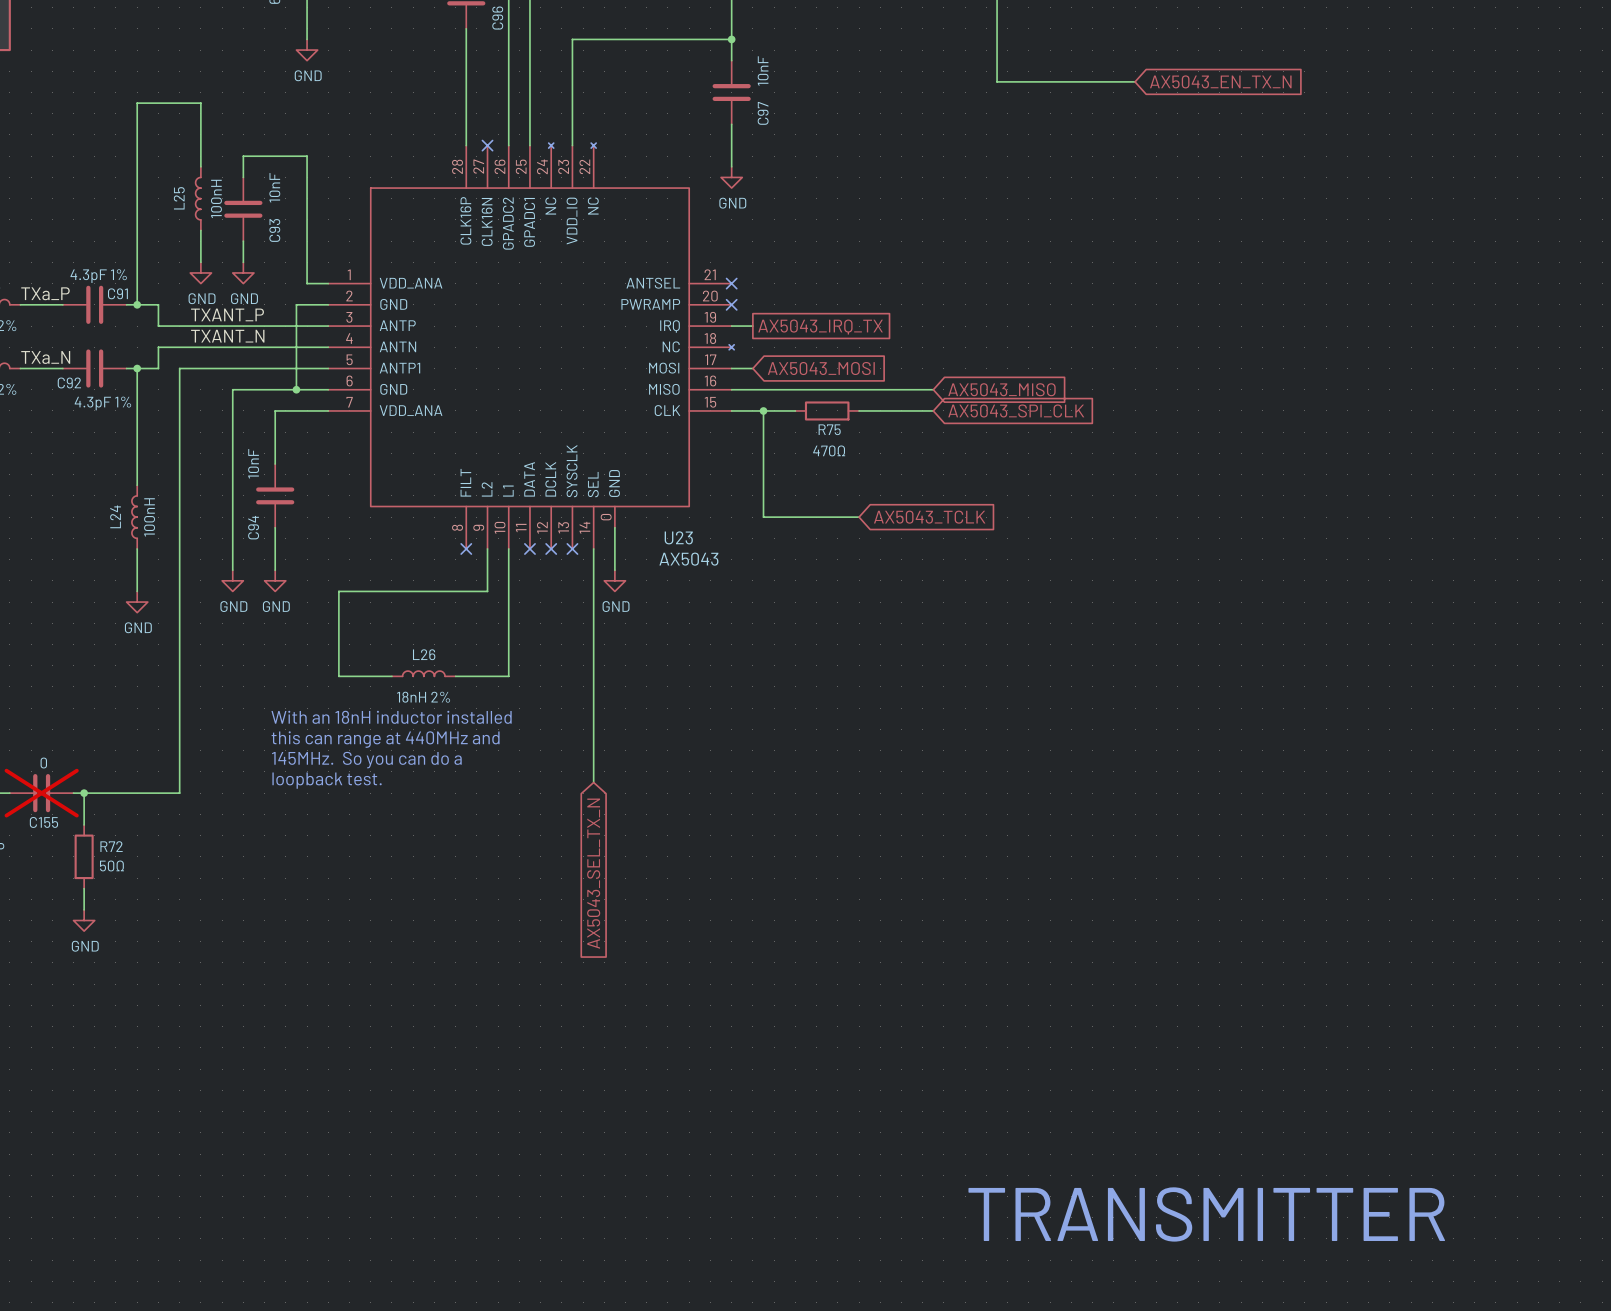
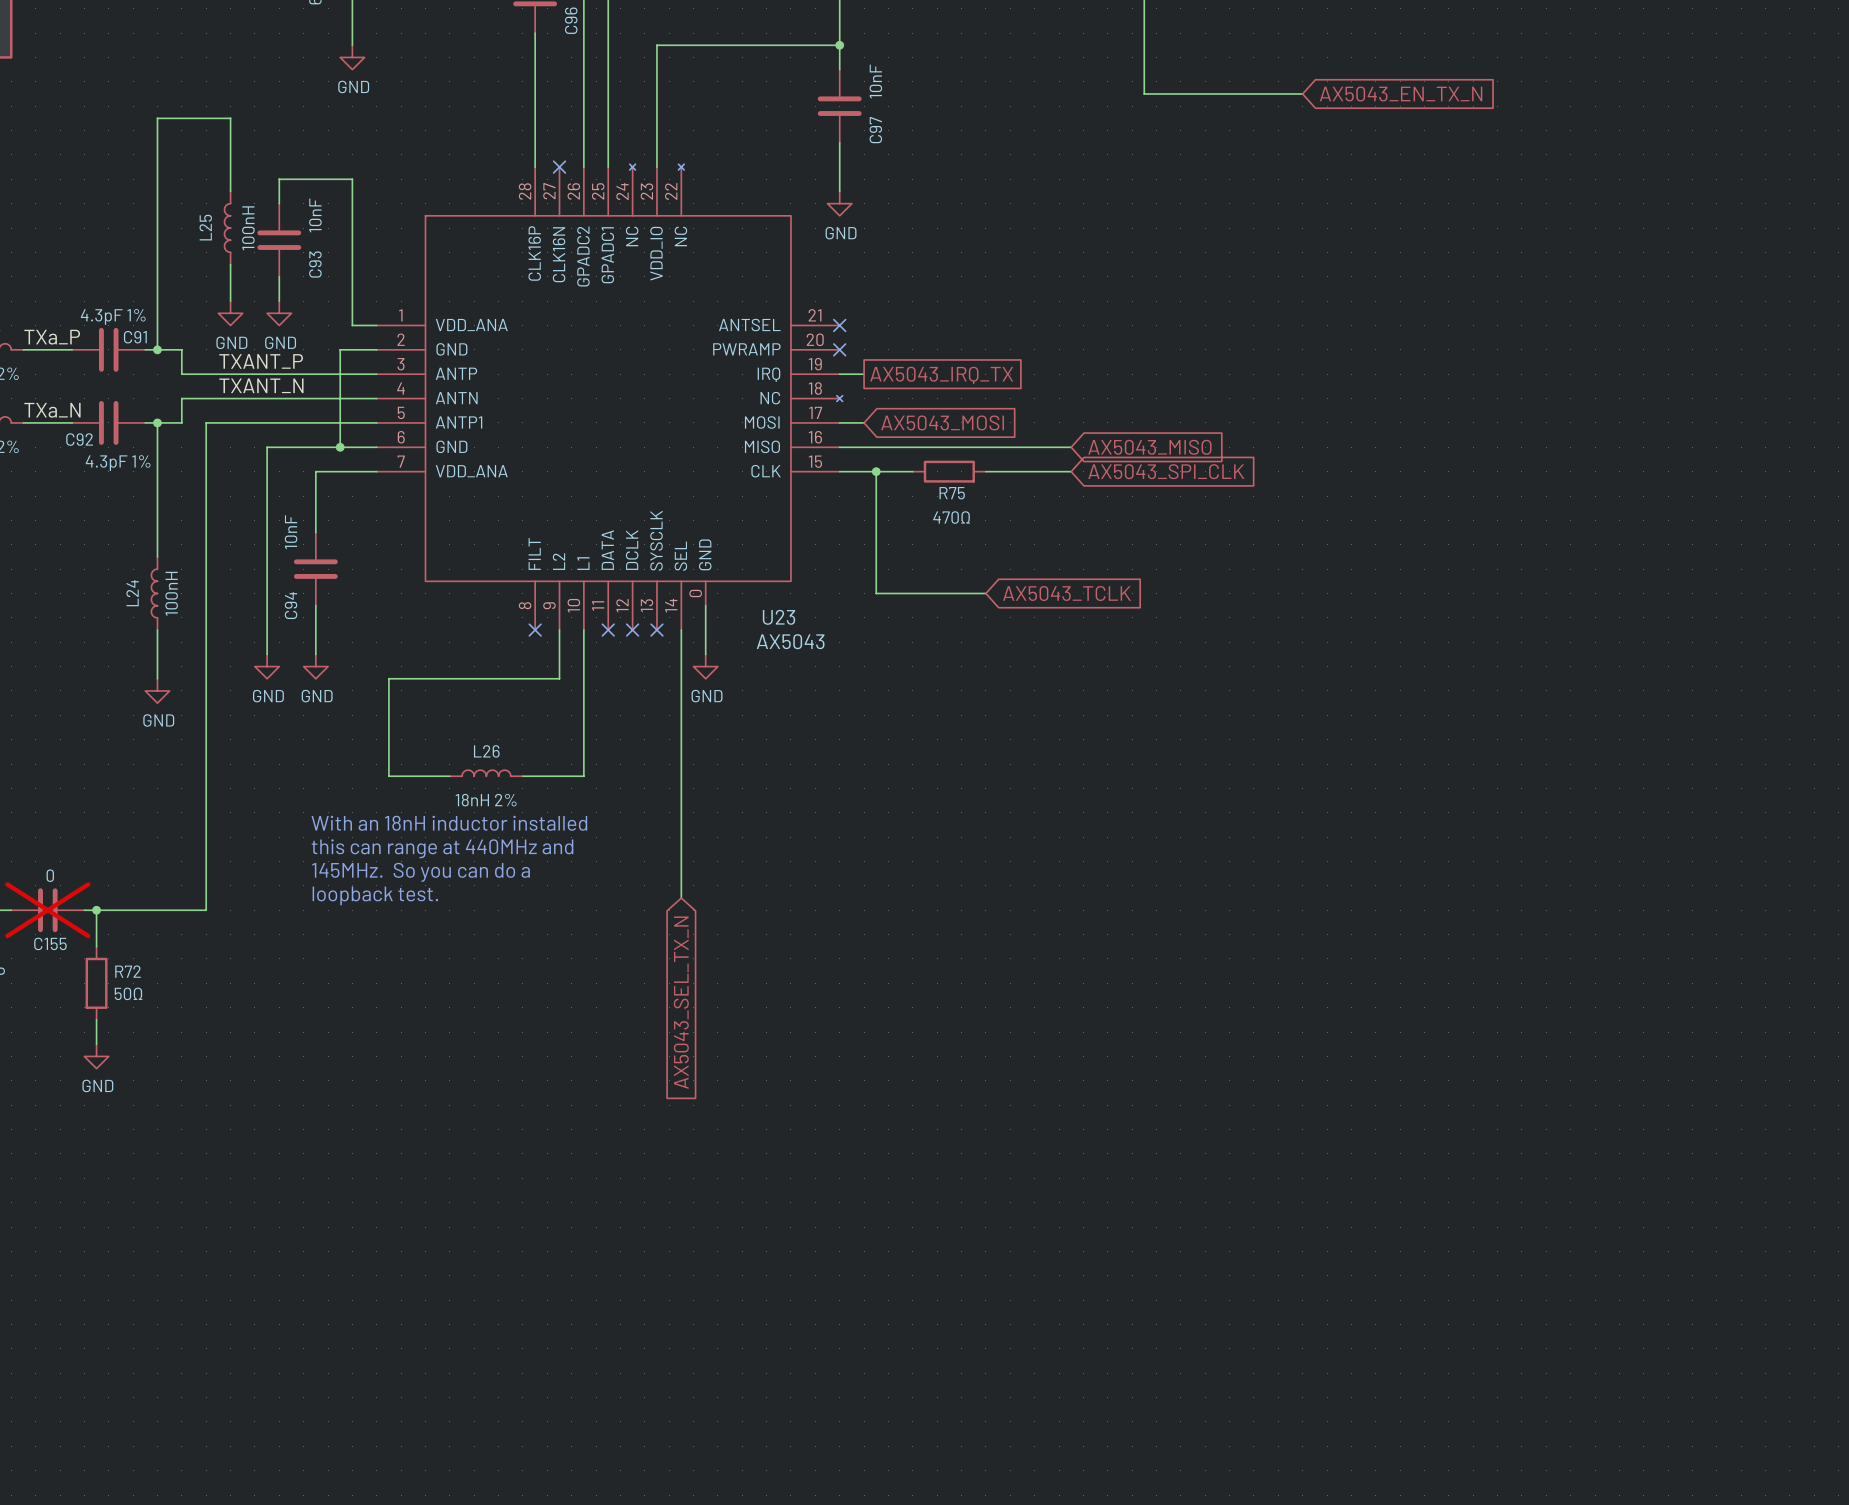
text: TRANSMITTER (1206, 1214) -> none

